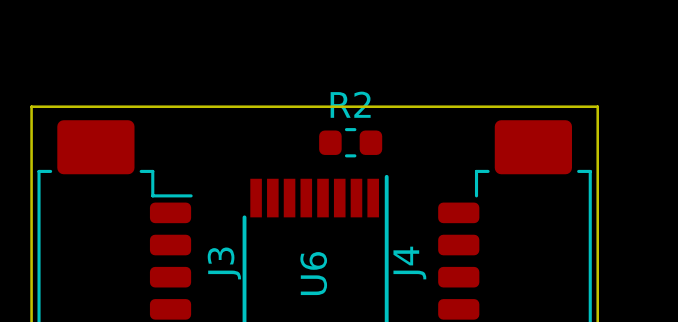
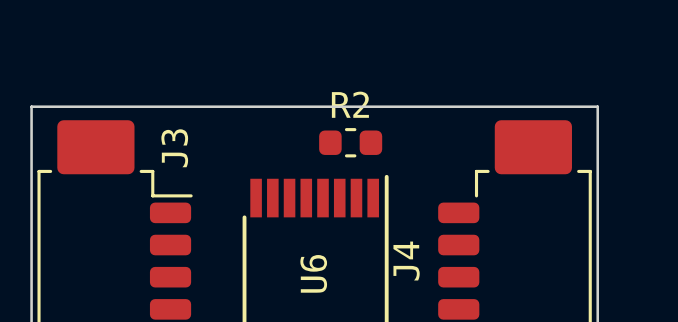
J3 name position: J3 (224, 263) -> J3 (174, 148)

